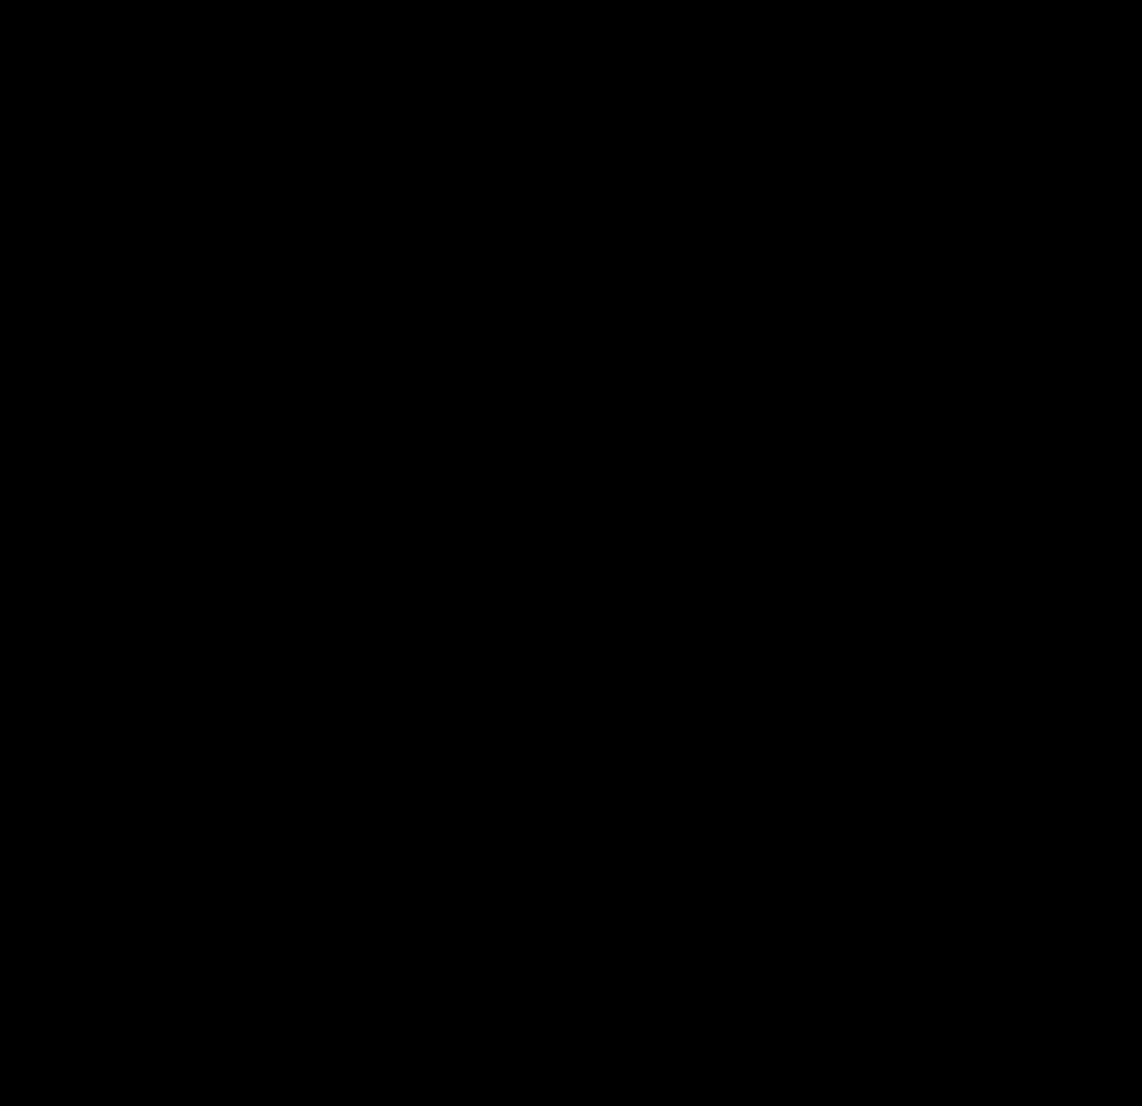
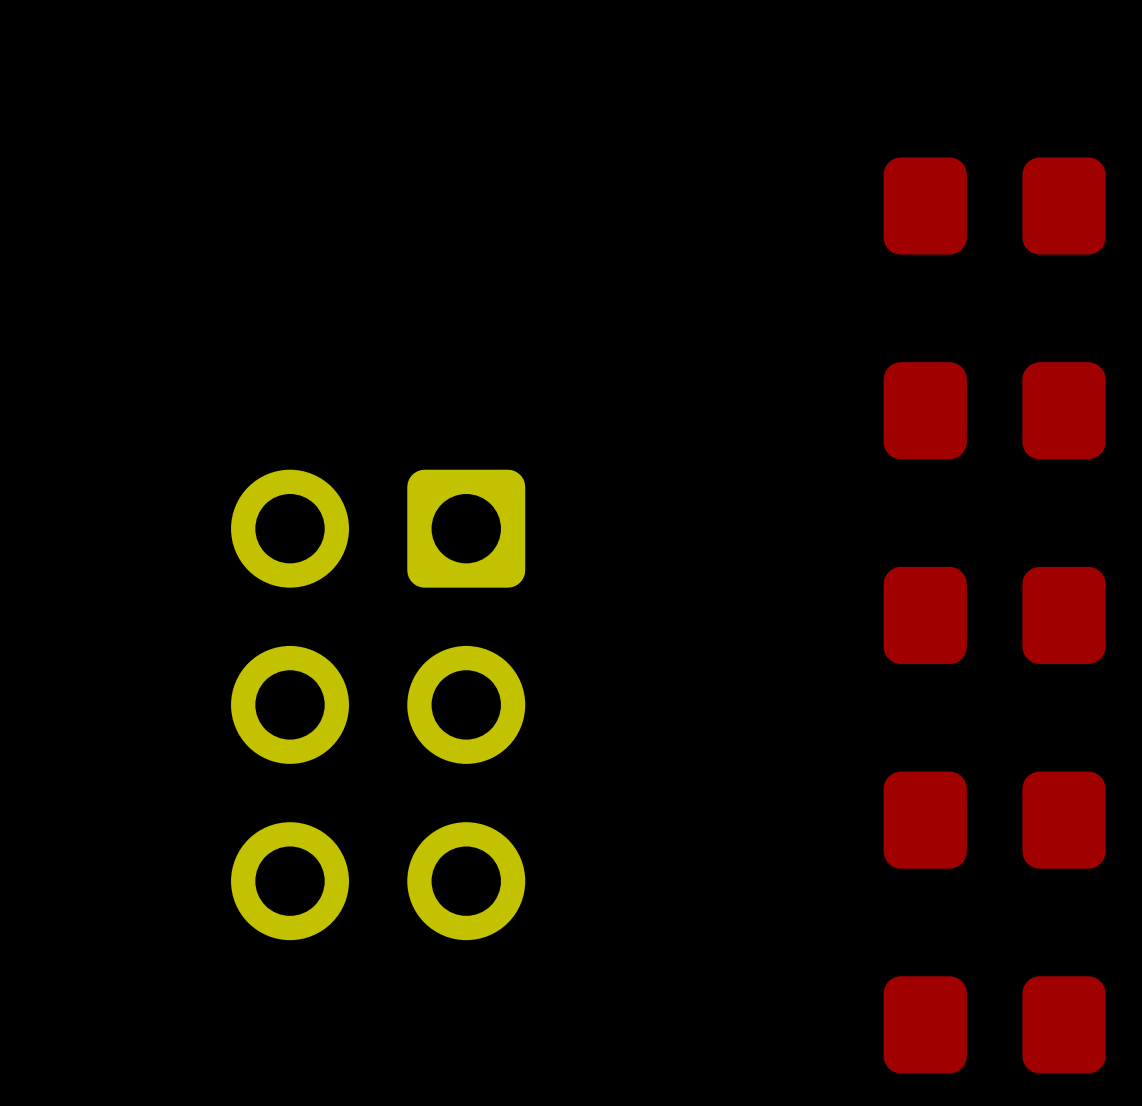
part: none -> (994, 206)
part: none -> (994, 410)
part: none -> (994, 615)
part: none -> (378, 704)
part: none -> (994, 820)
part: none -> (994, 1024)

